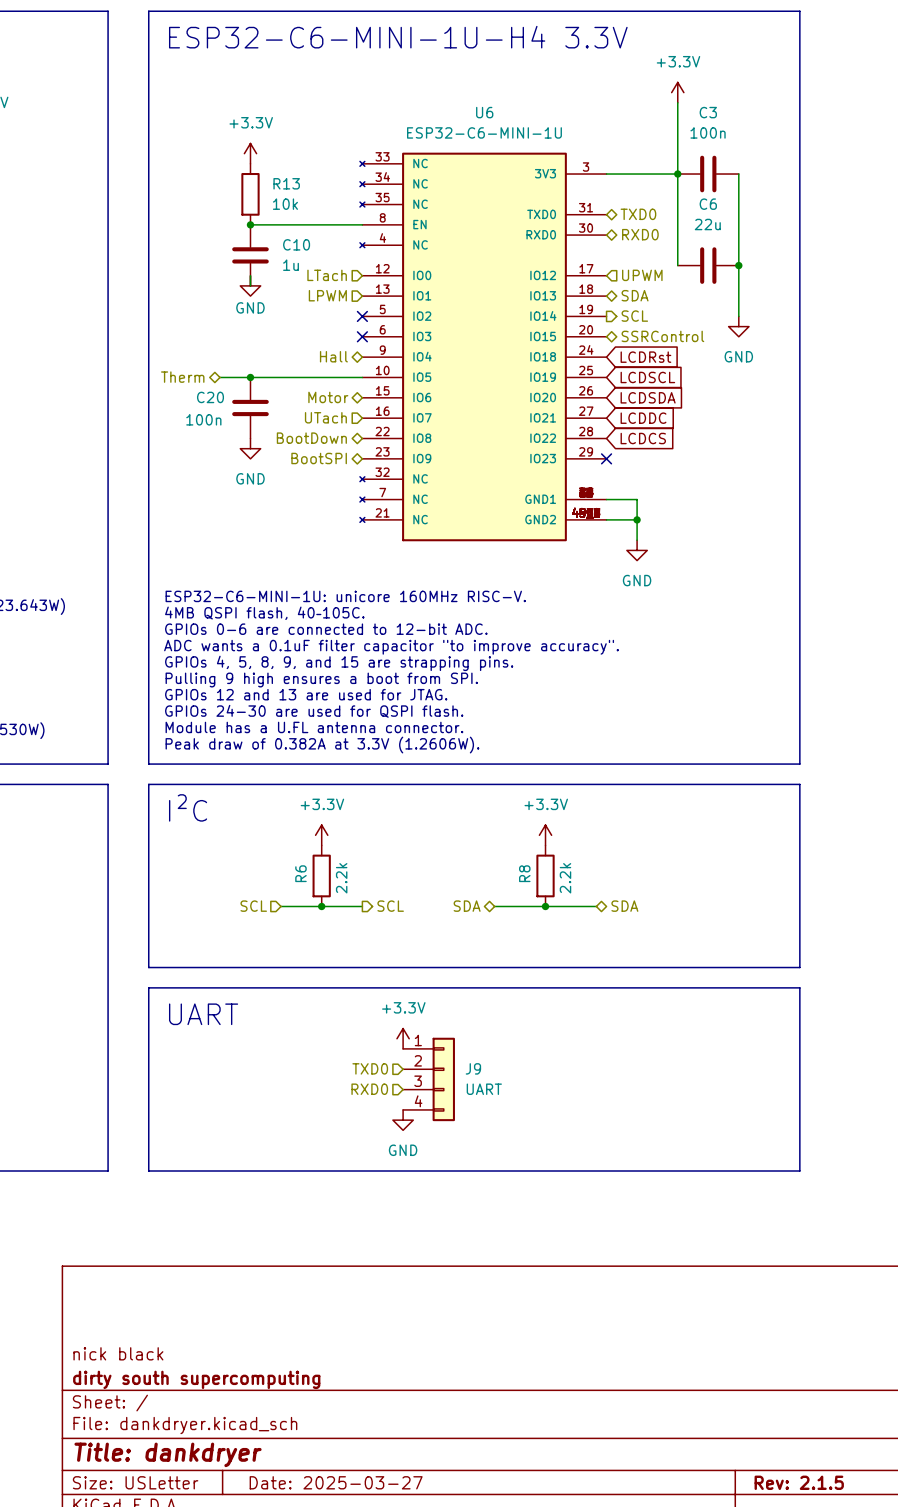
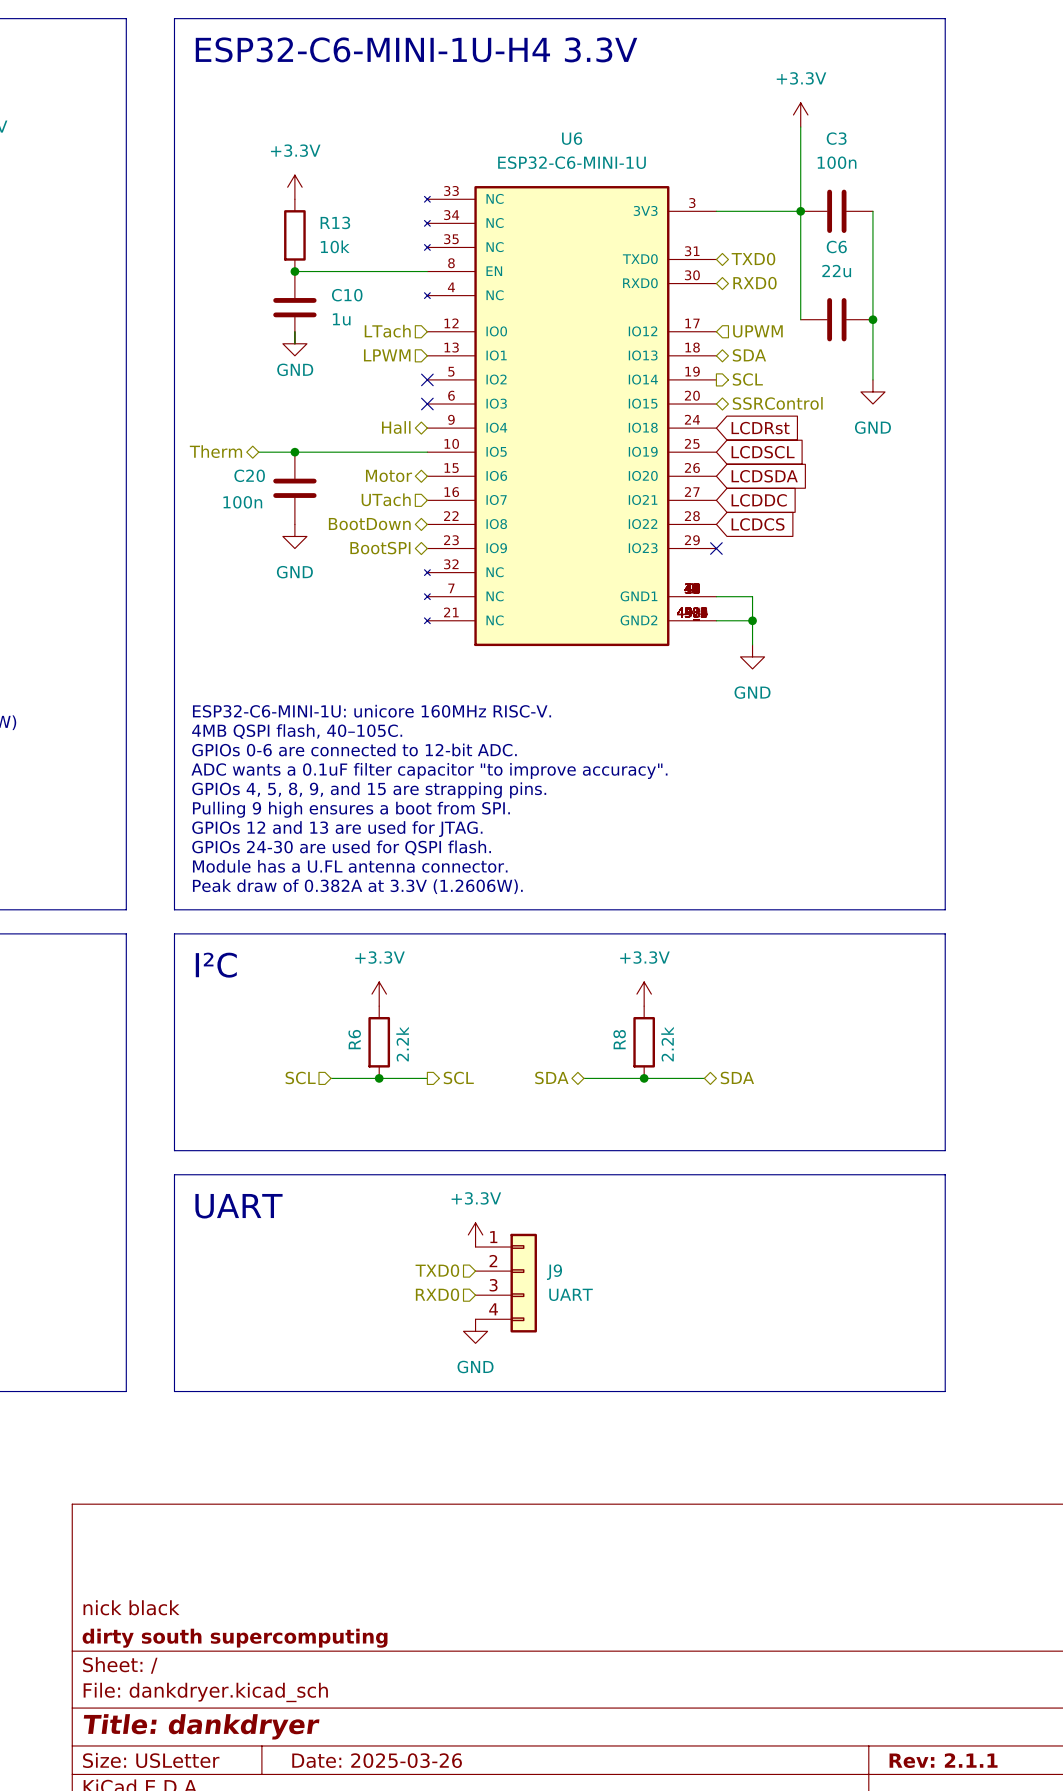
title block: Date: 2025-03-27 (336, 1482) -> Date: 2025-03-26 (377, 1760)
title block: Rev: 2.1.5 (799, 1482) -> Rev: 2.1.1 (943, 1760)

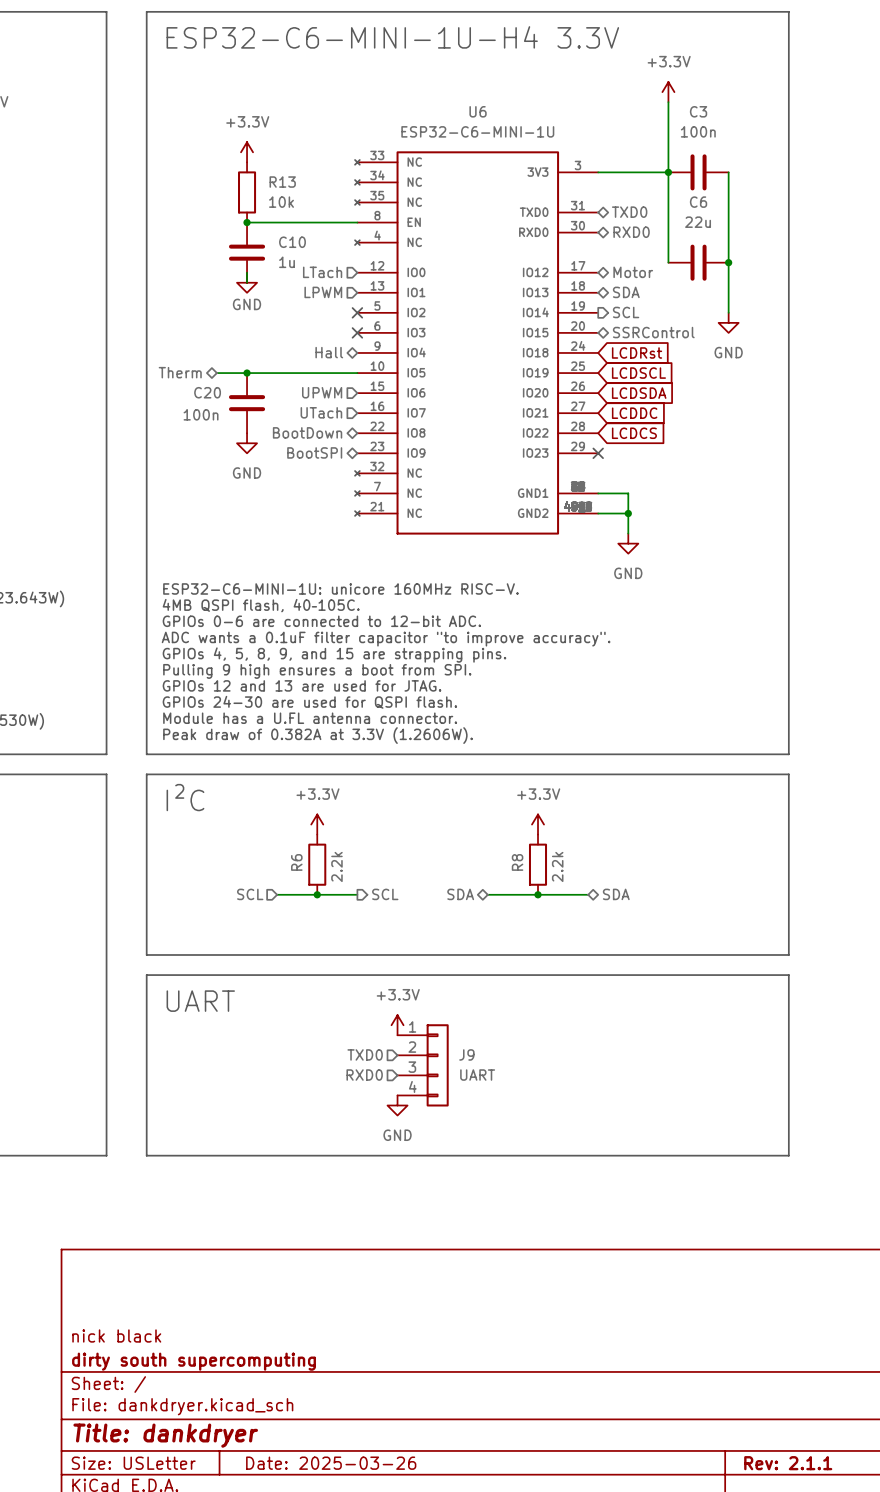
hierarchical label shape: input (757, 331) -> bidirectional (633, 272)
hierarchical label: UPWM (757, 331) -> Motor (633, 272)
hierarchical label shape: bidirectional (389, 475) -> input (322, 392)
hierarchical label: Motor (389, 475) -> UPWM (322, 392)

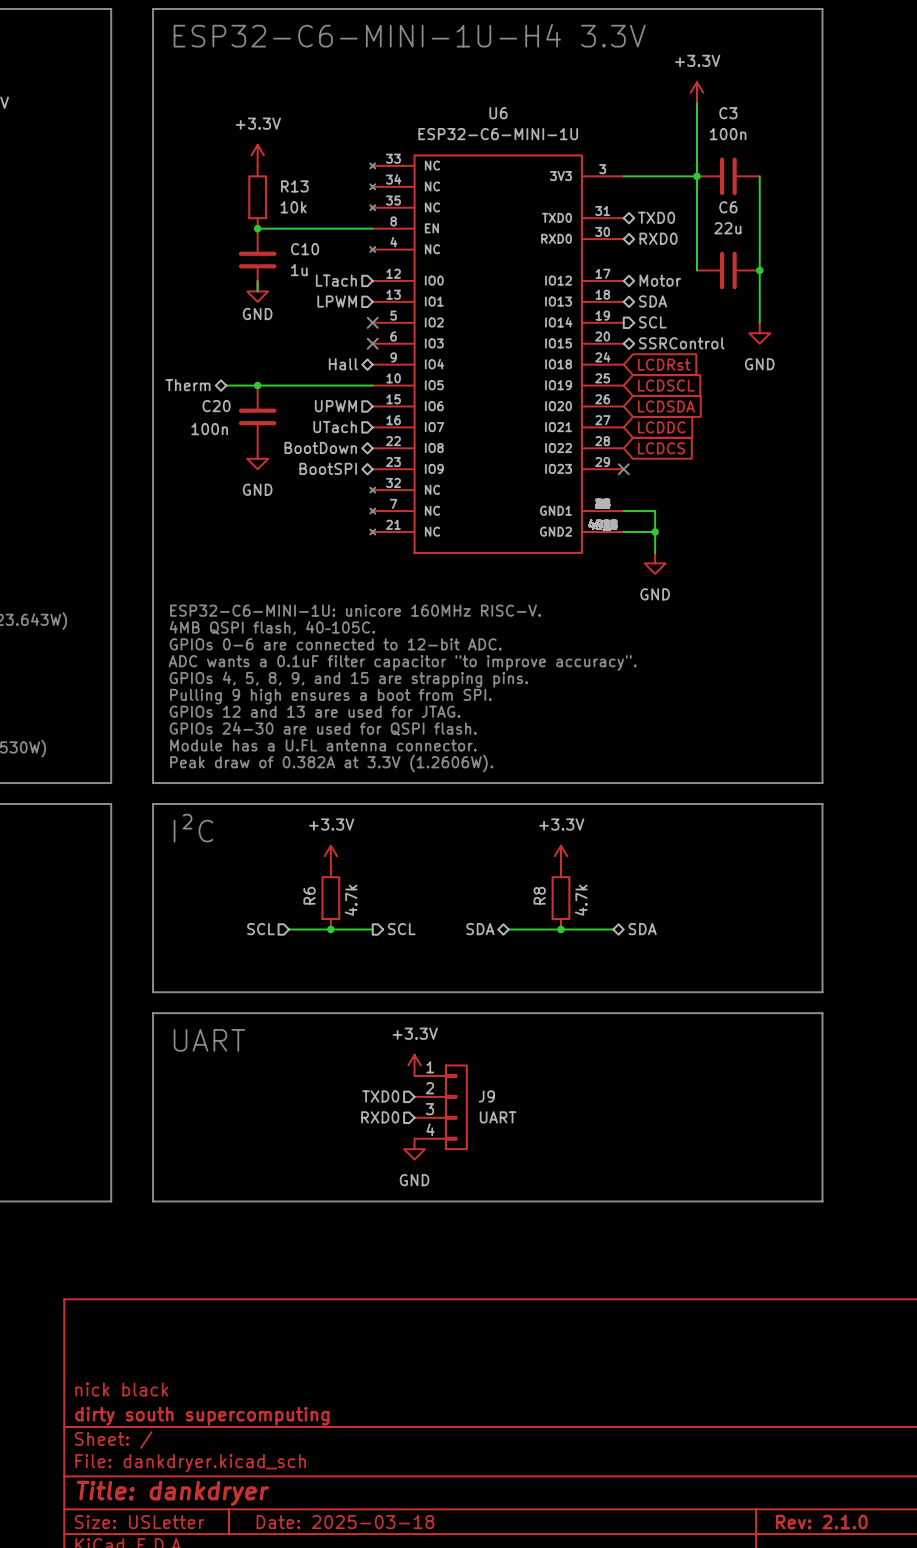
R6 value: 2.2k (336, 866) -> 4.7k (351, 900)
R8 value: 2.2k (557, 866) -> 4.7k (581, 900)
title block: Date: 2025-03-26 (331, 1463) -> Date: 2025-03-18 (345, 1522)
title block: Rev: 2.1.1 (788, 1463) -> Rev: 2.1.0 (821, 1522)

